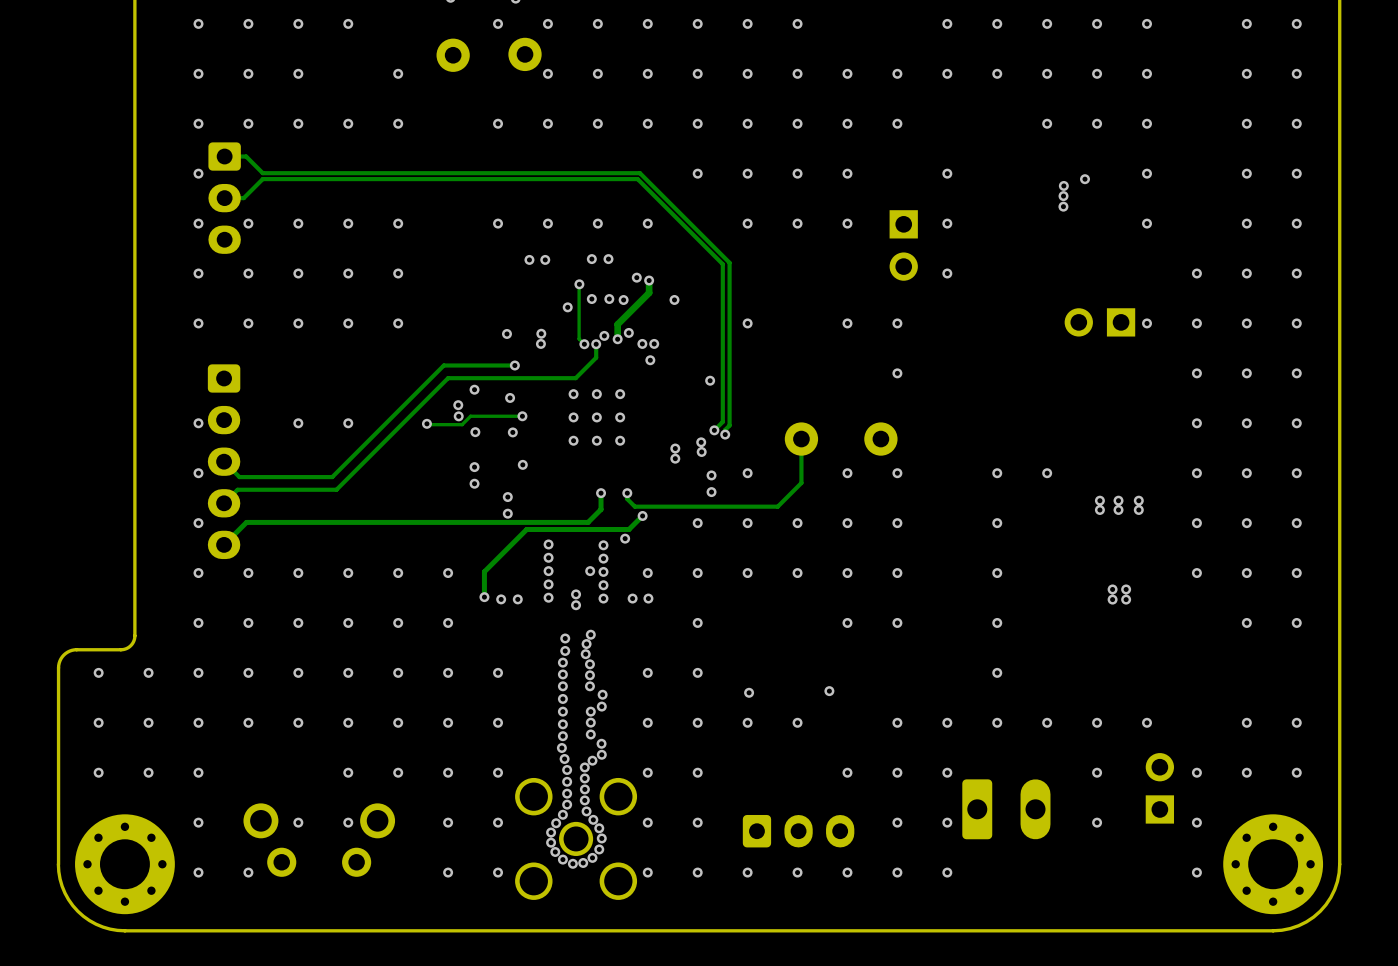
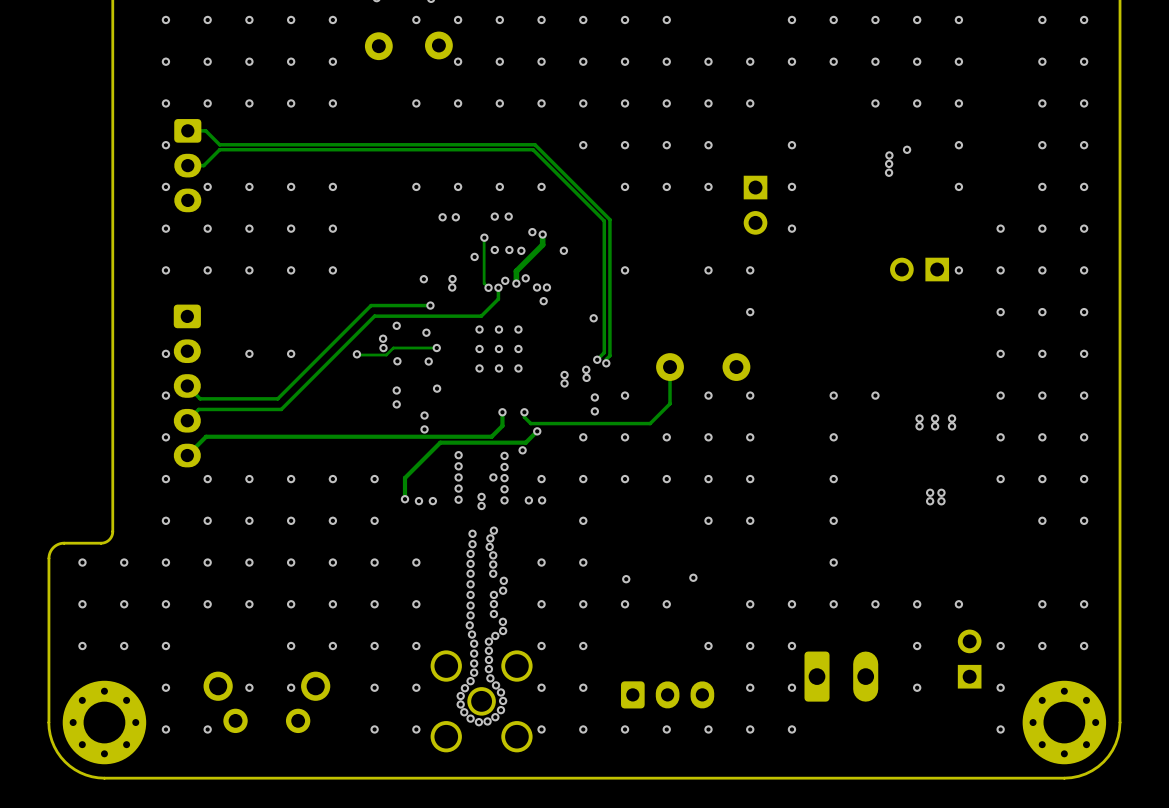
via: none -> (332, 19)
via: none -> (291, 61)

